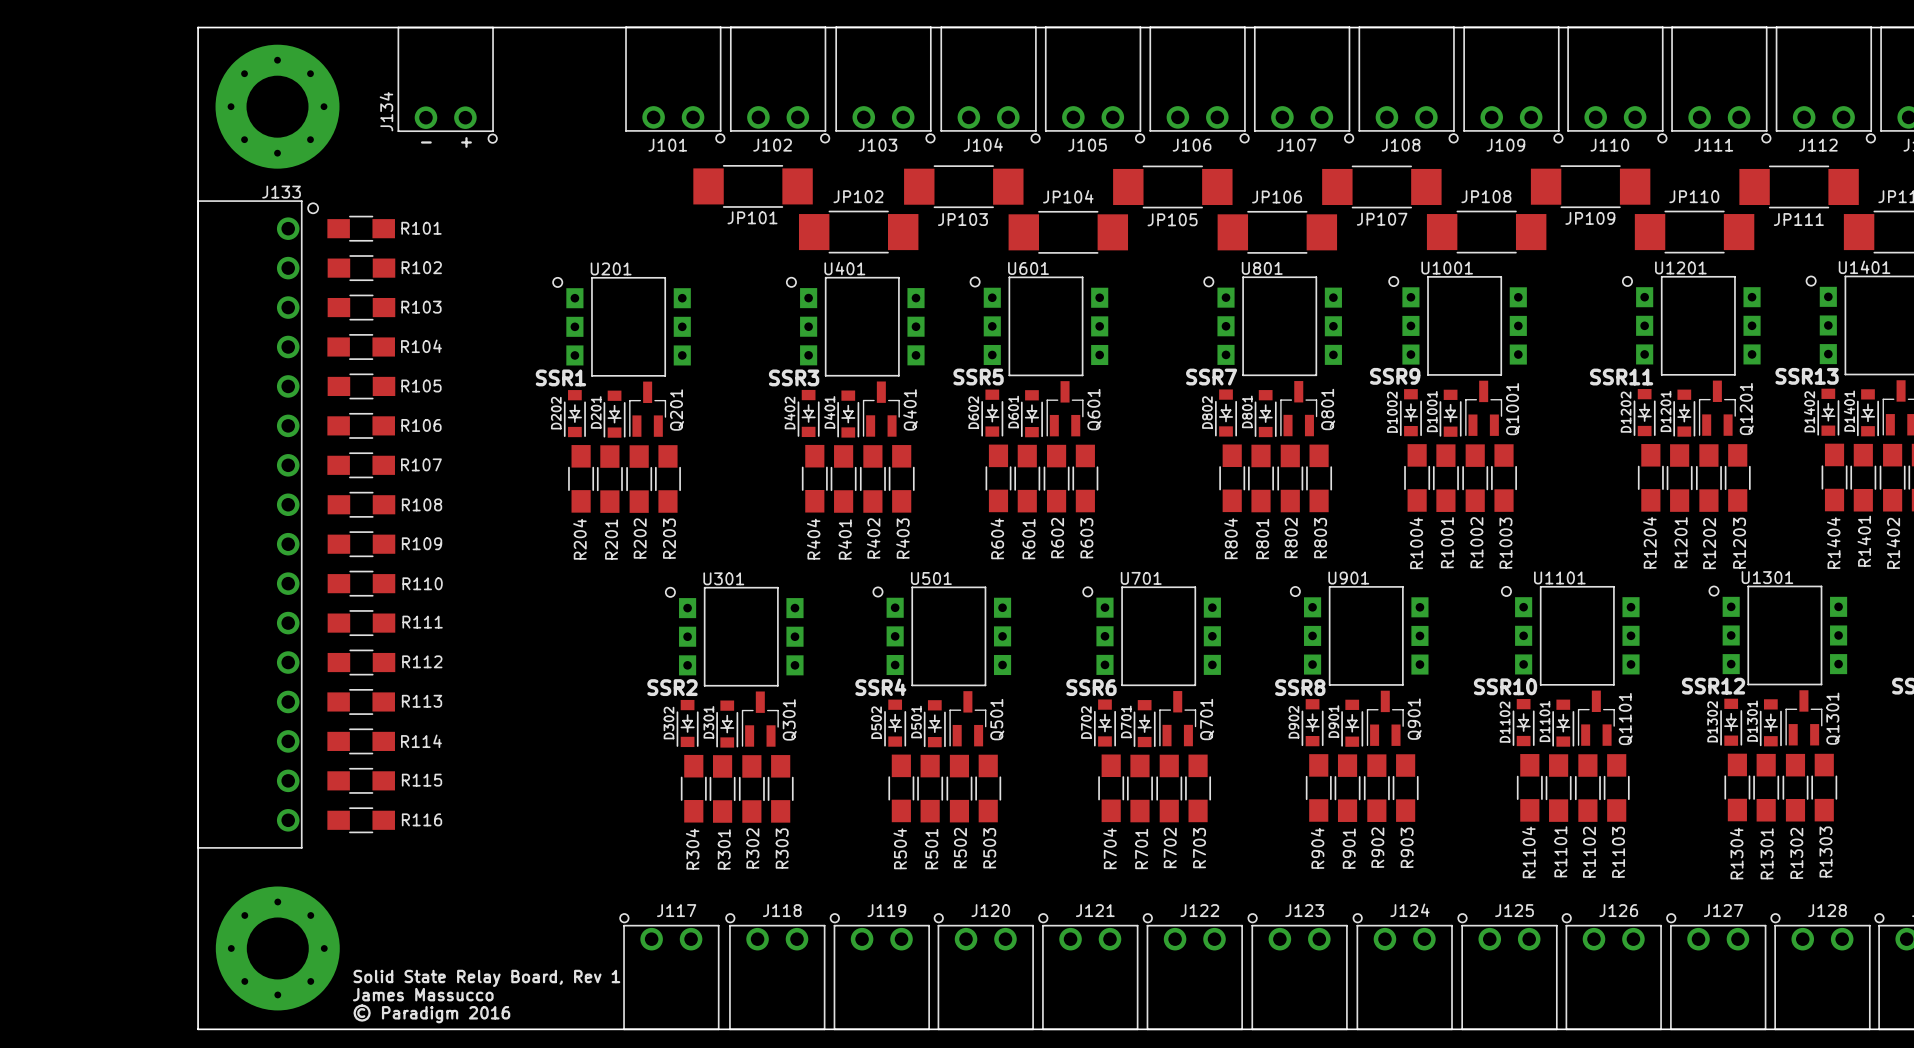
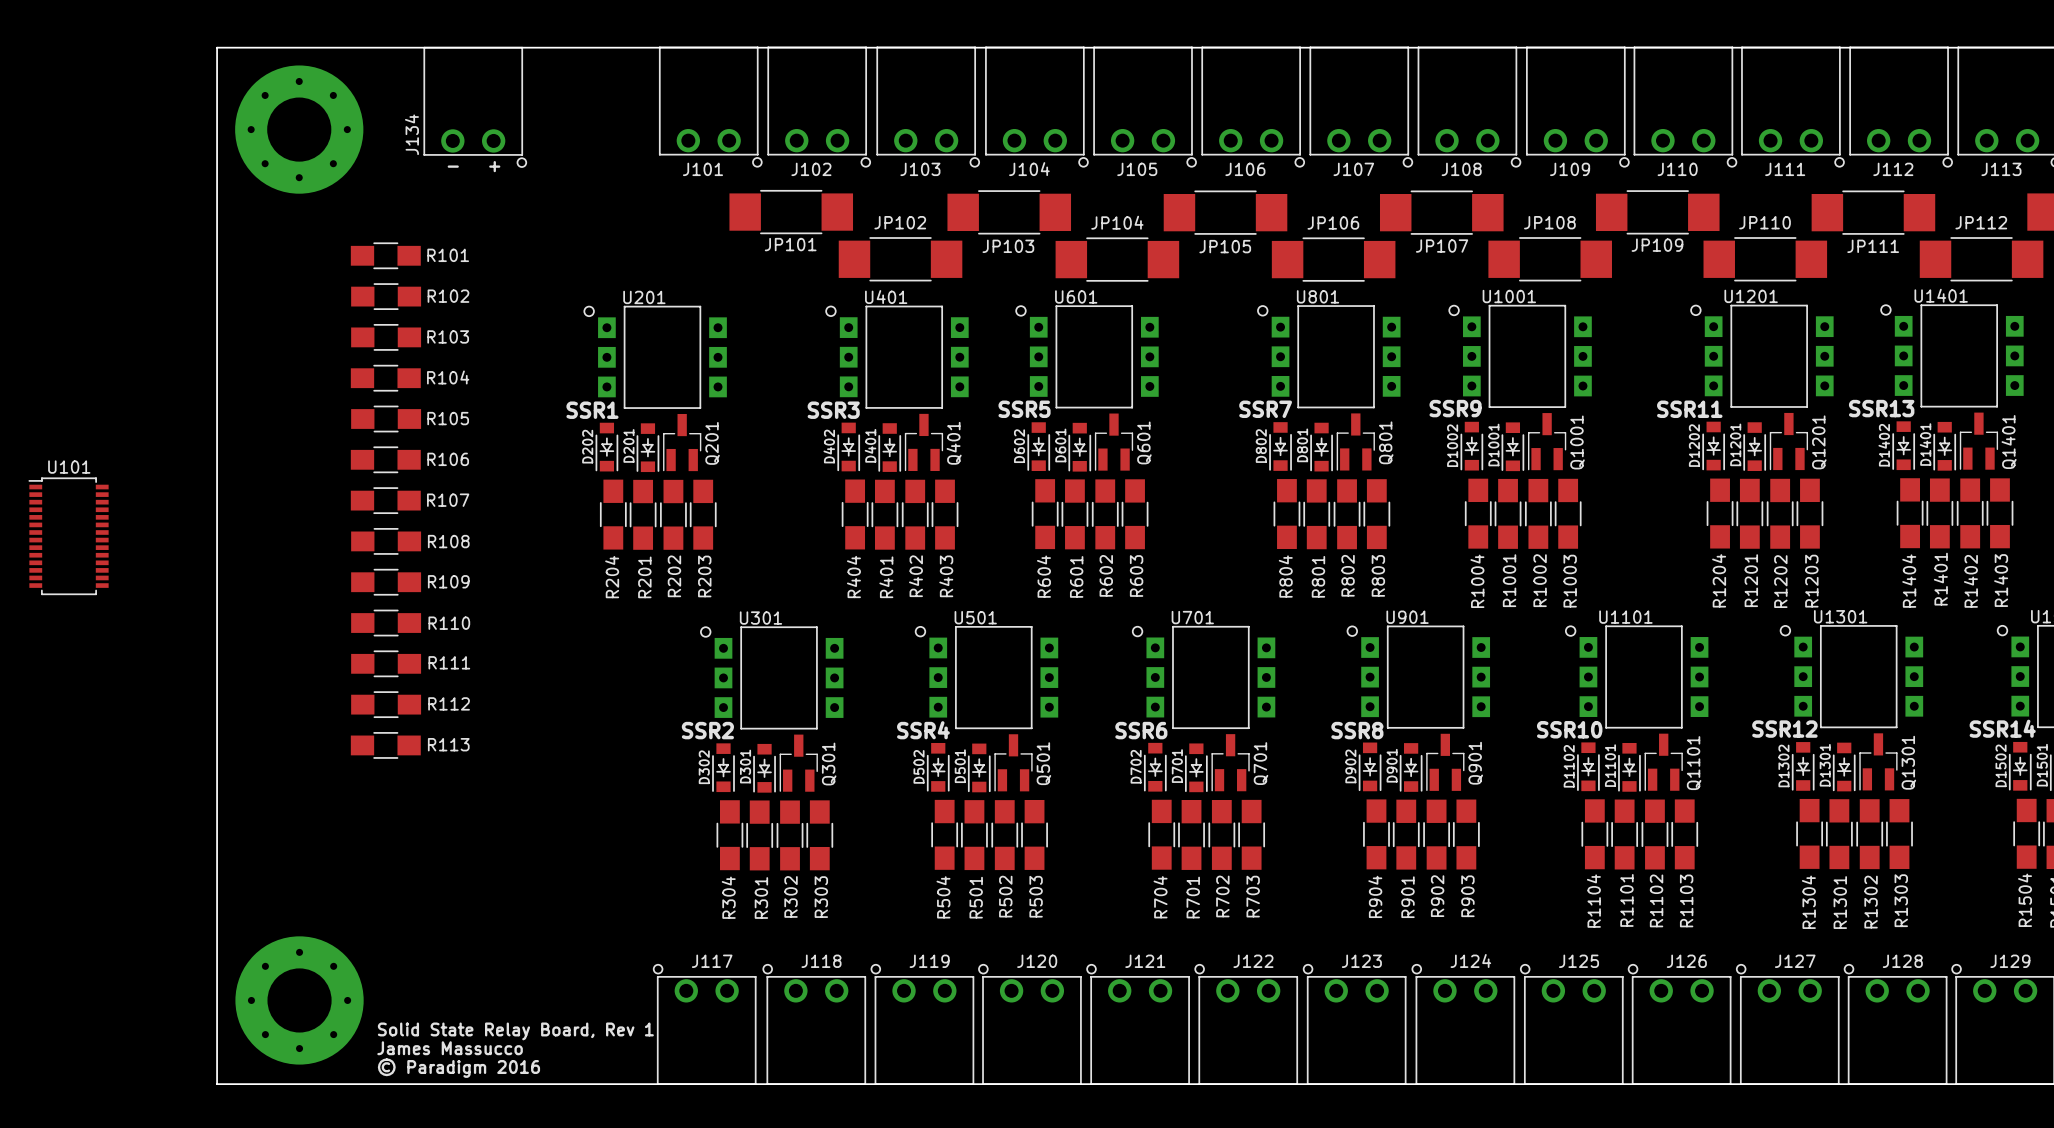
U101: none -> (68, 536)
J133: (258, 524) -> none
R114: (361, 741) -> none
R115: (361, 780) -> none
R116: (361, 820) -> none

